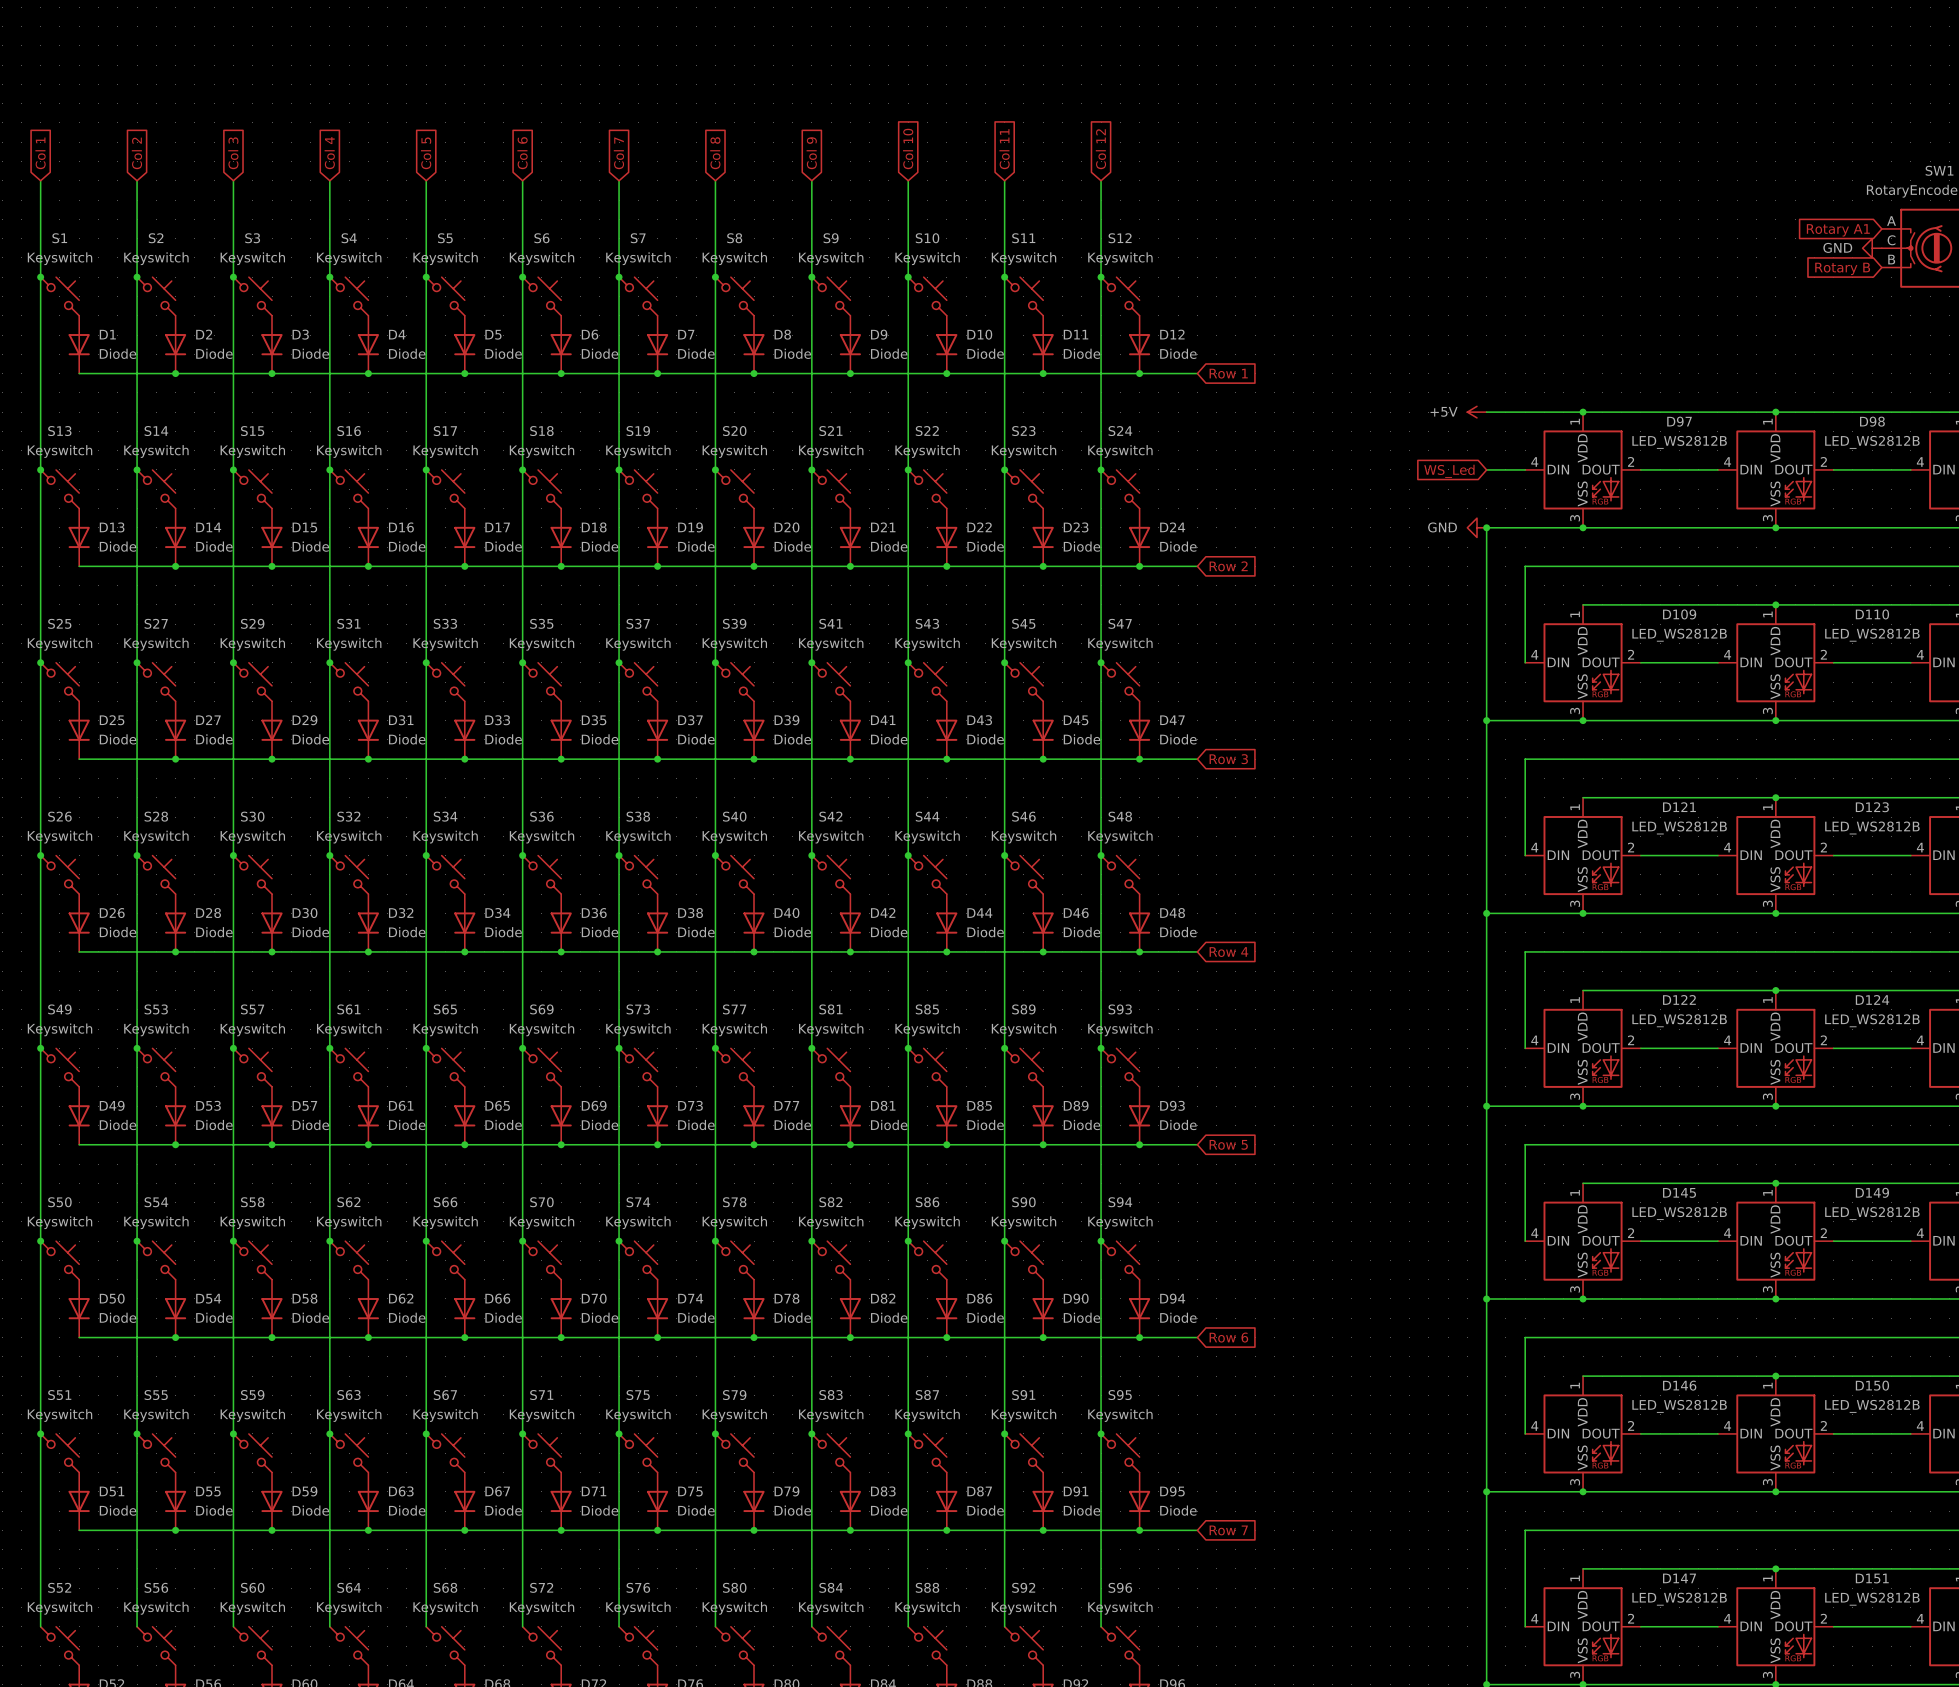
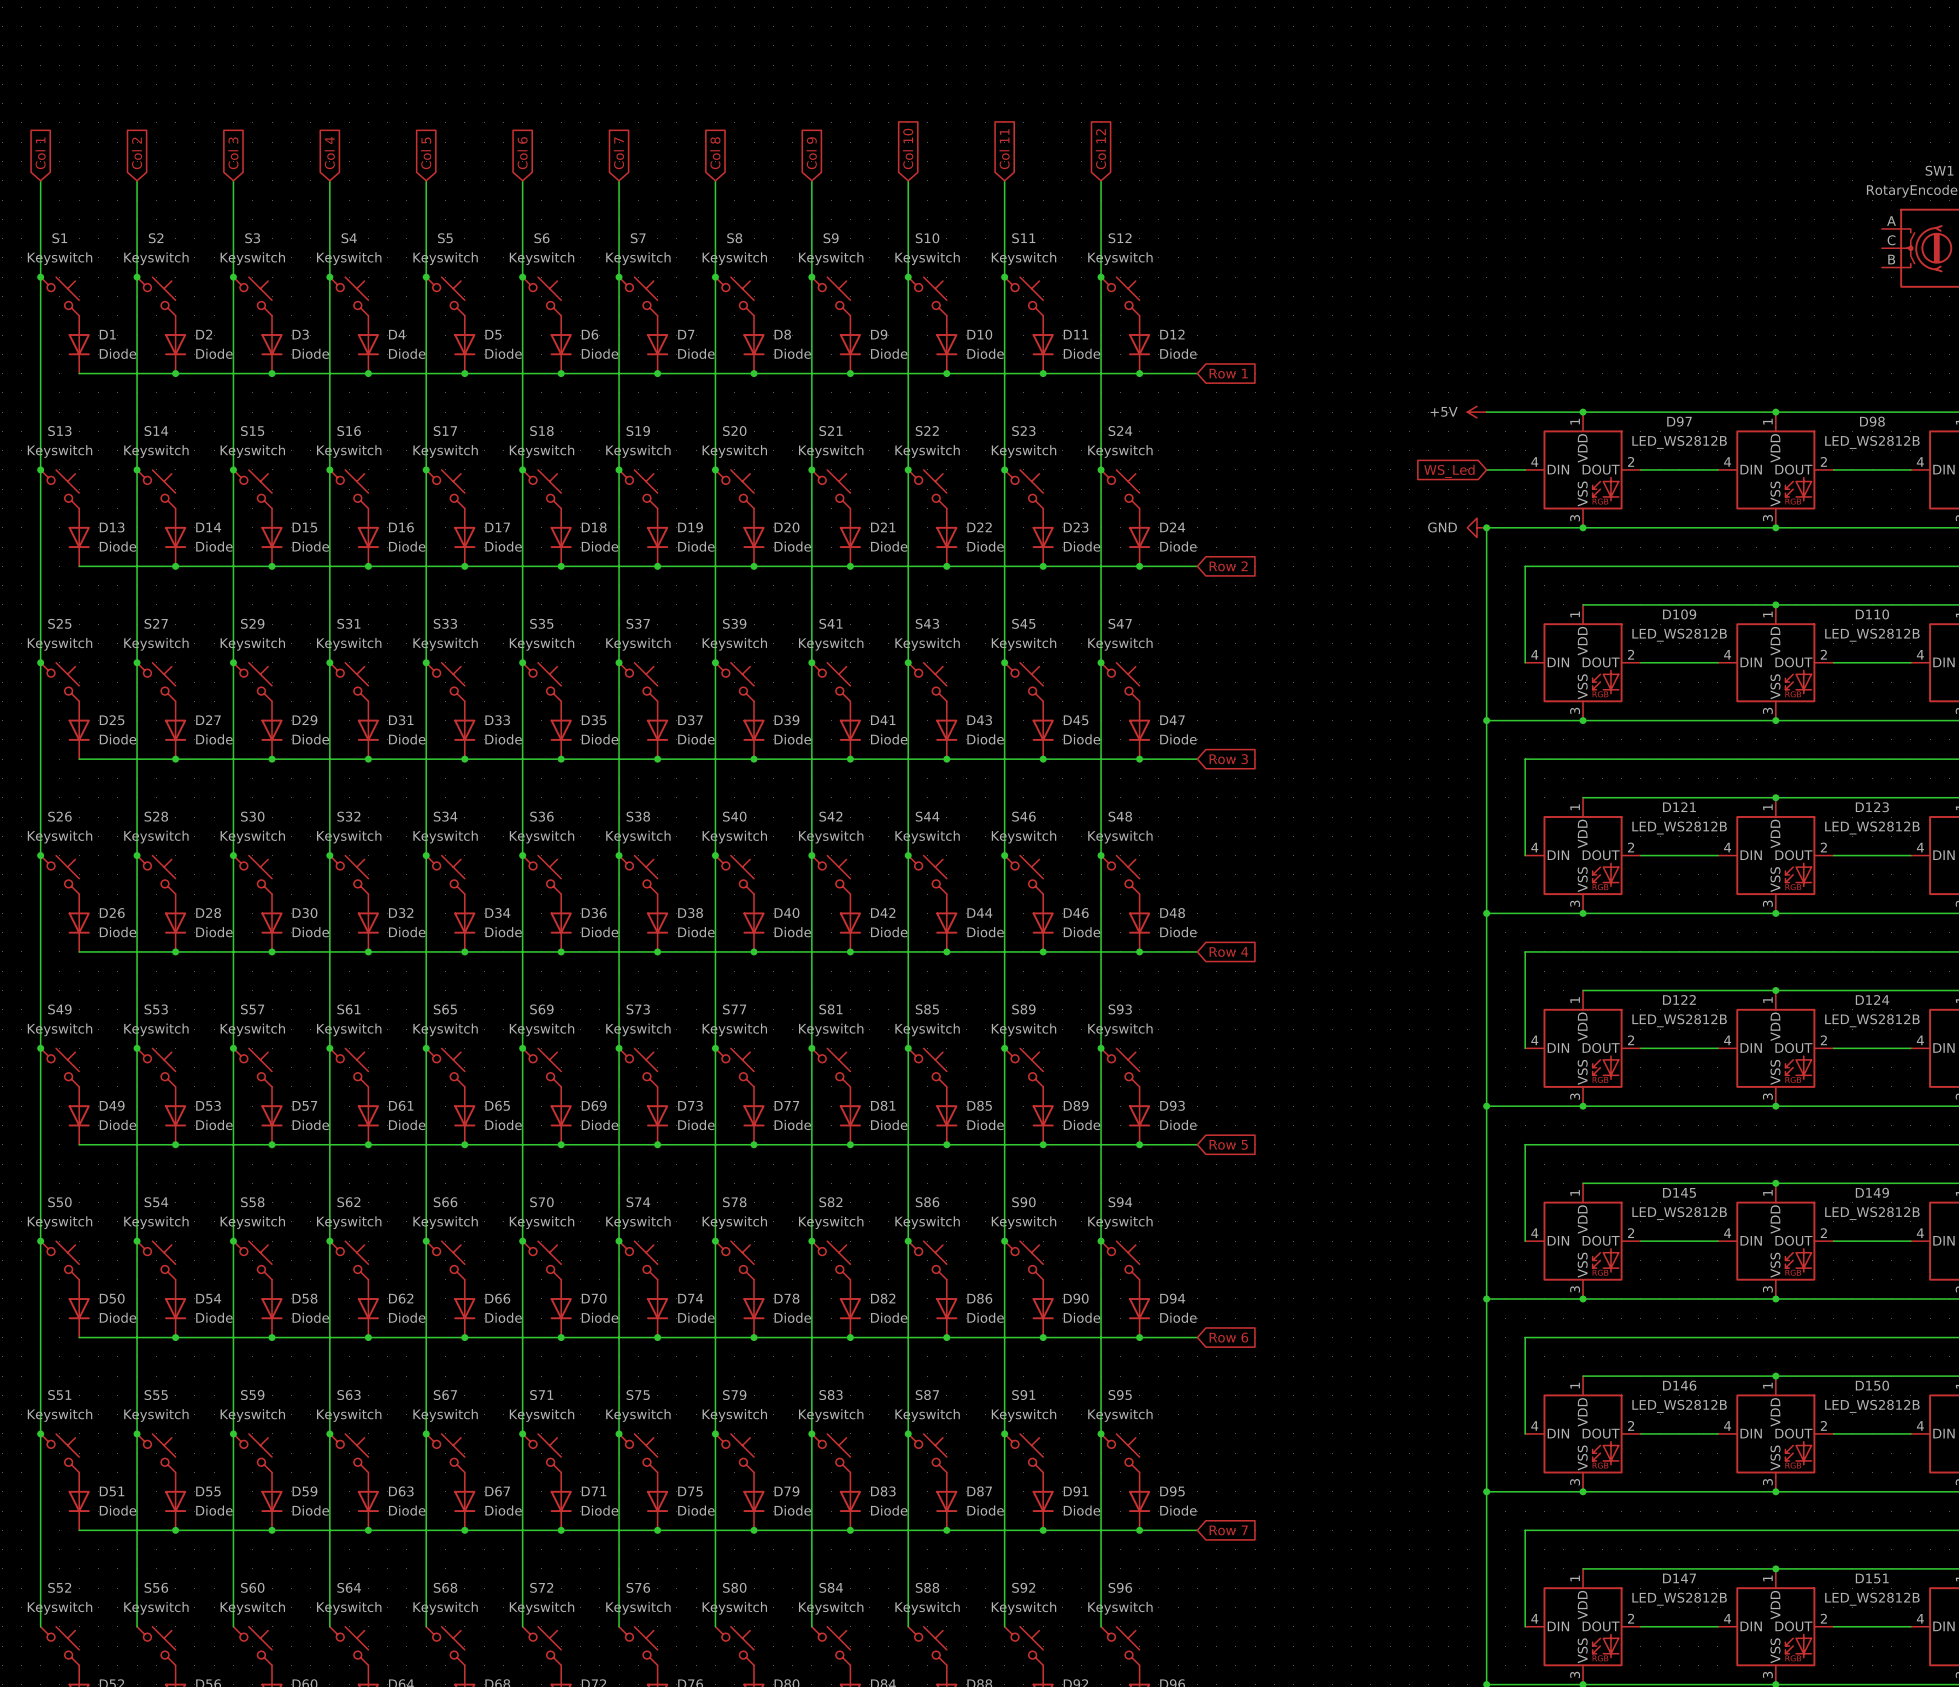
global label: Rotary A1 (1838, 230) -> none
power symbol: GND (1872, 248) -> none
global label: Rotary B (1842, 268) -> none

